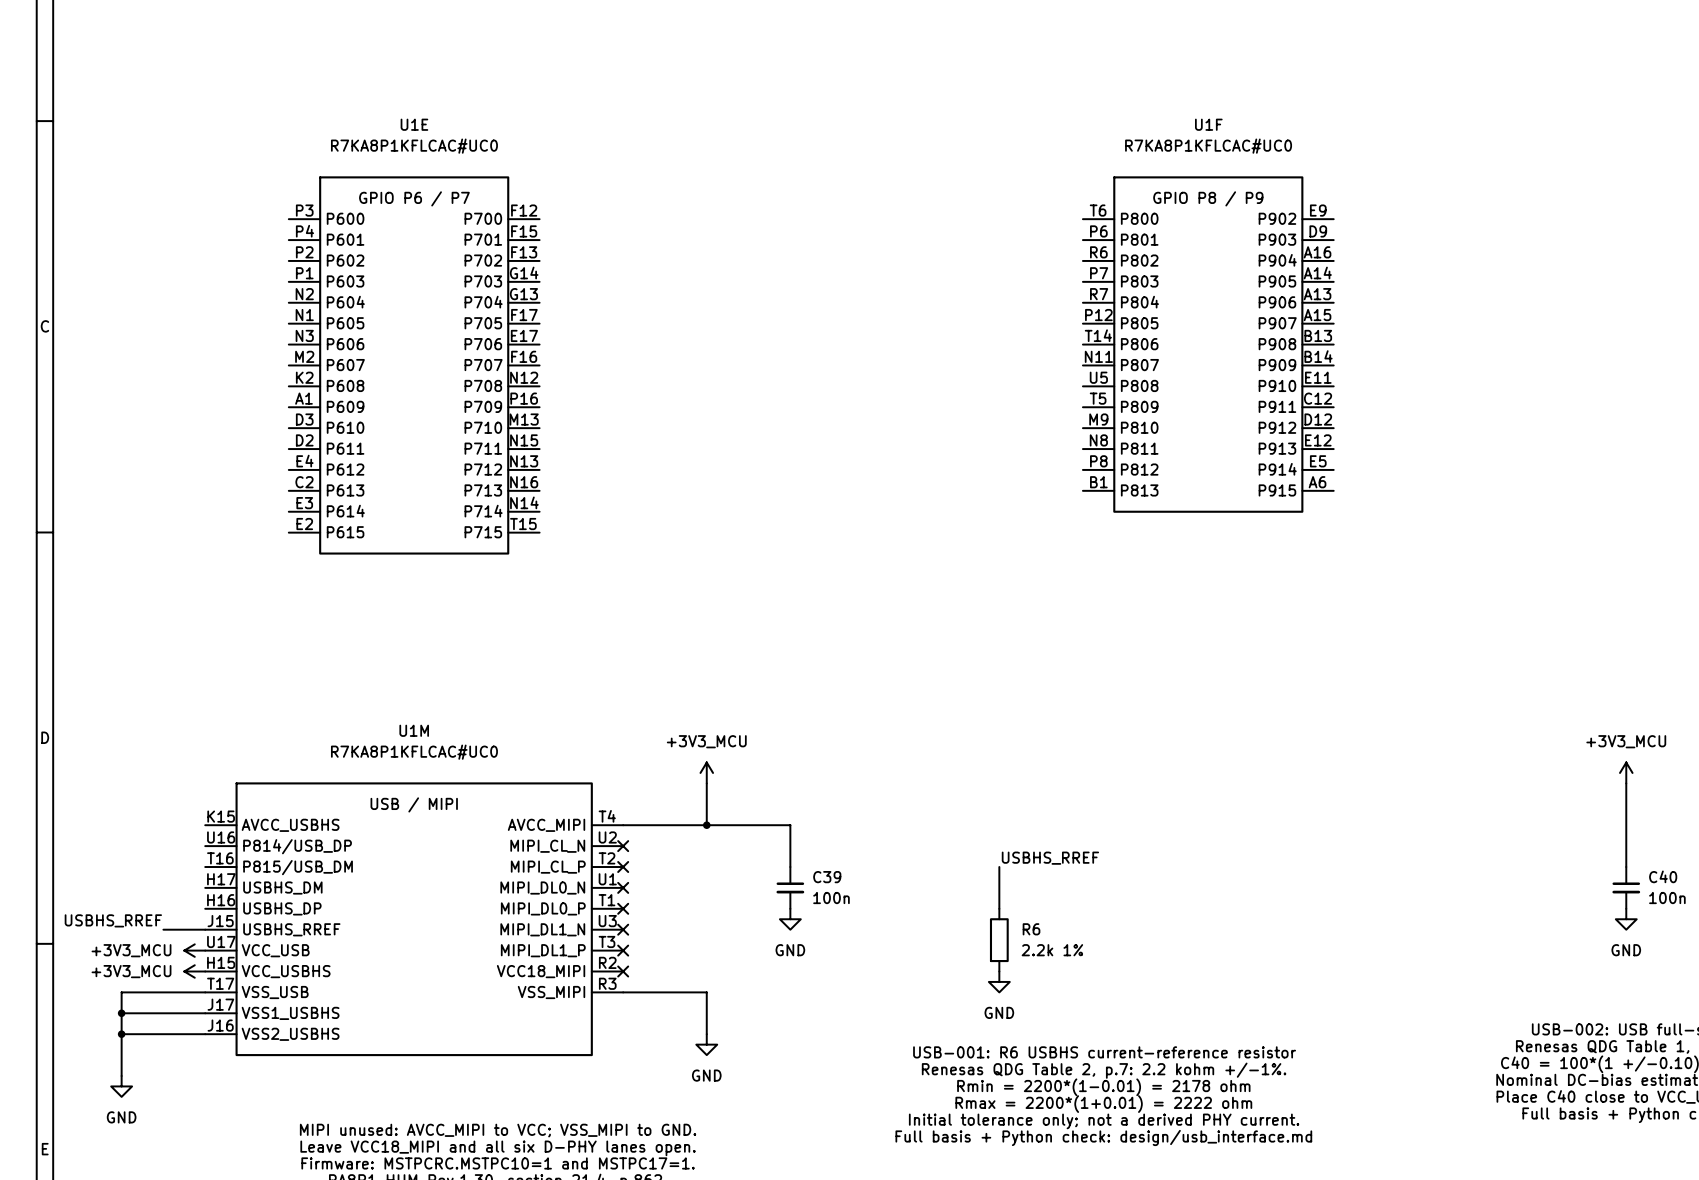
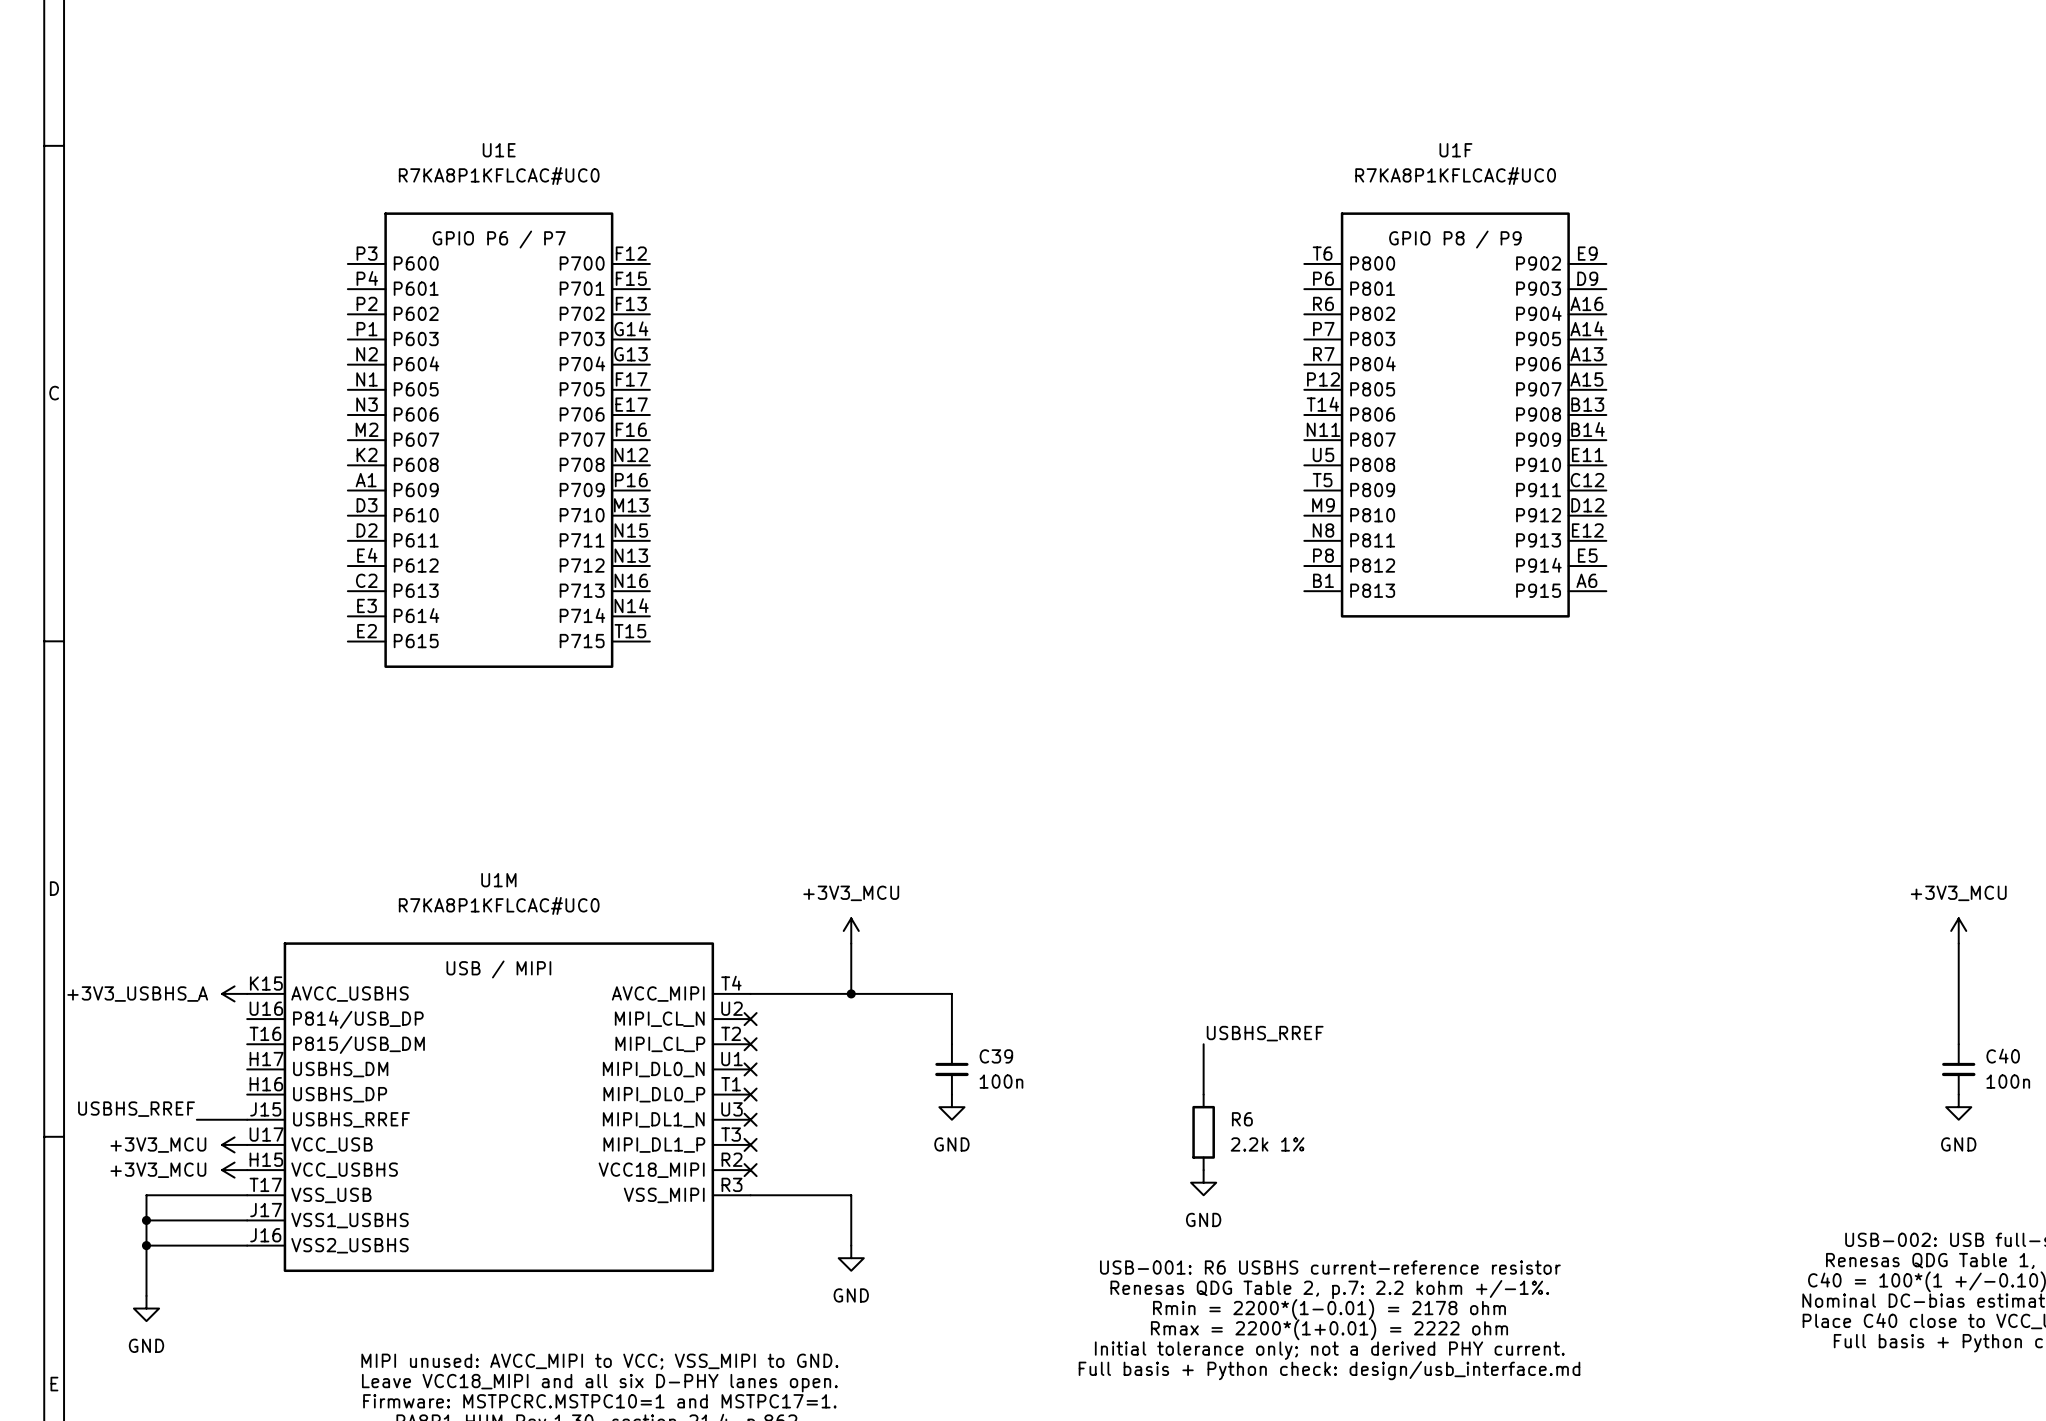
power symbol: none -> +3V3_USBHS_A (234, 993)

